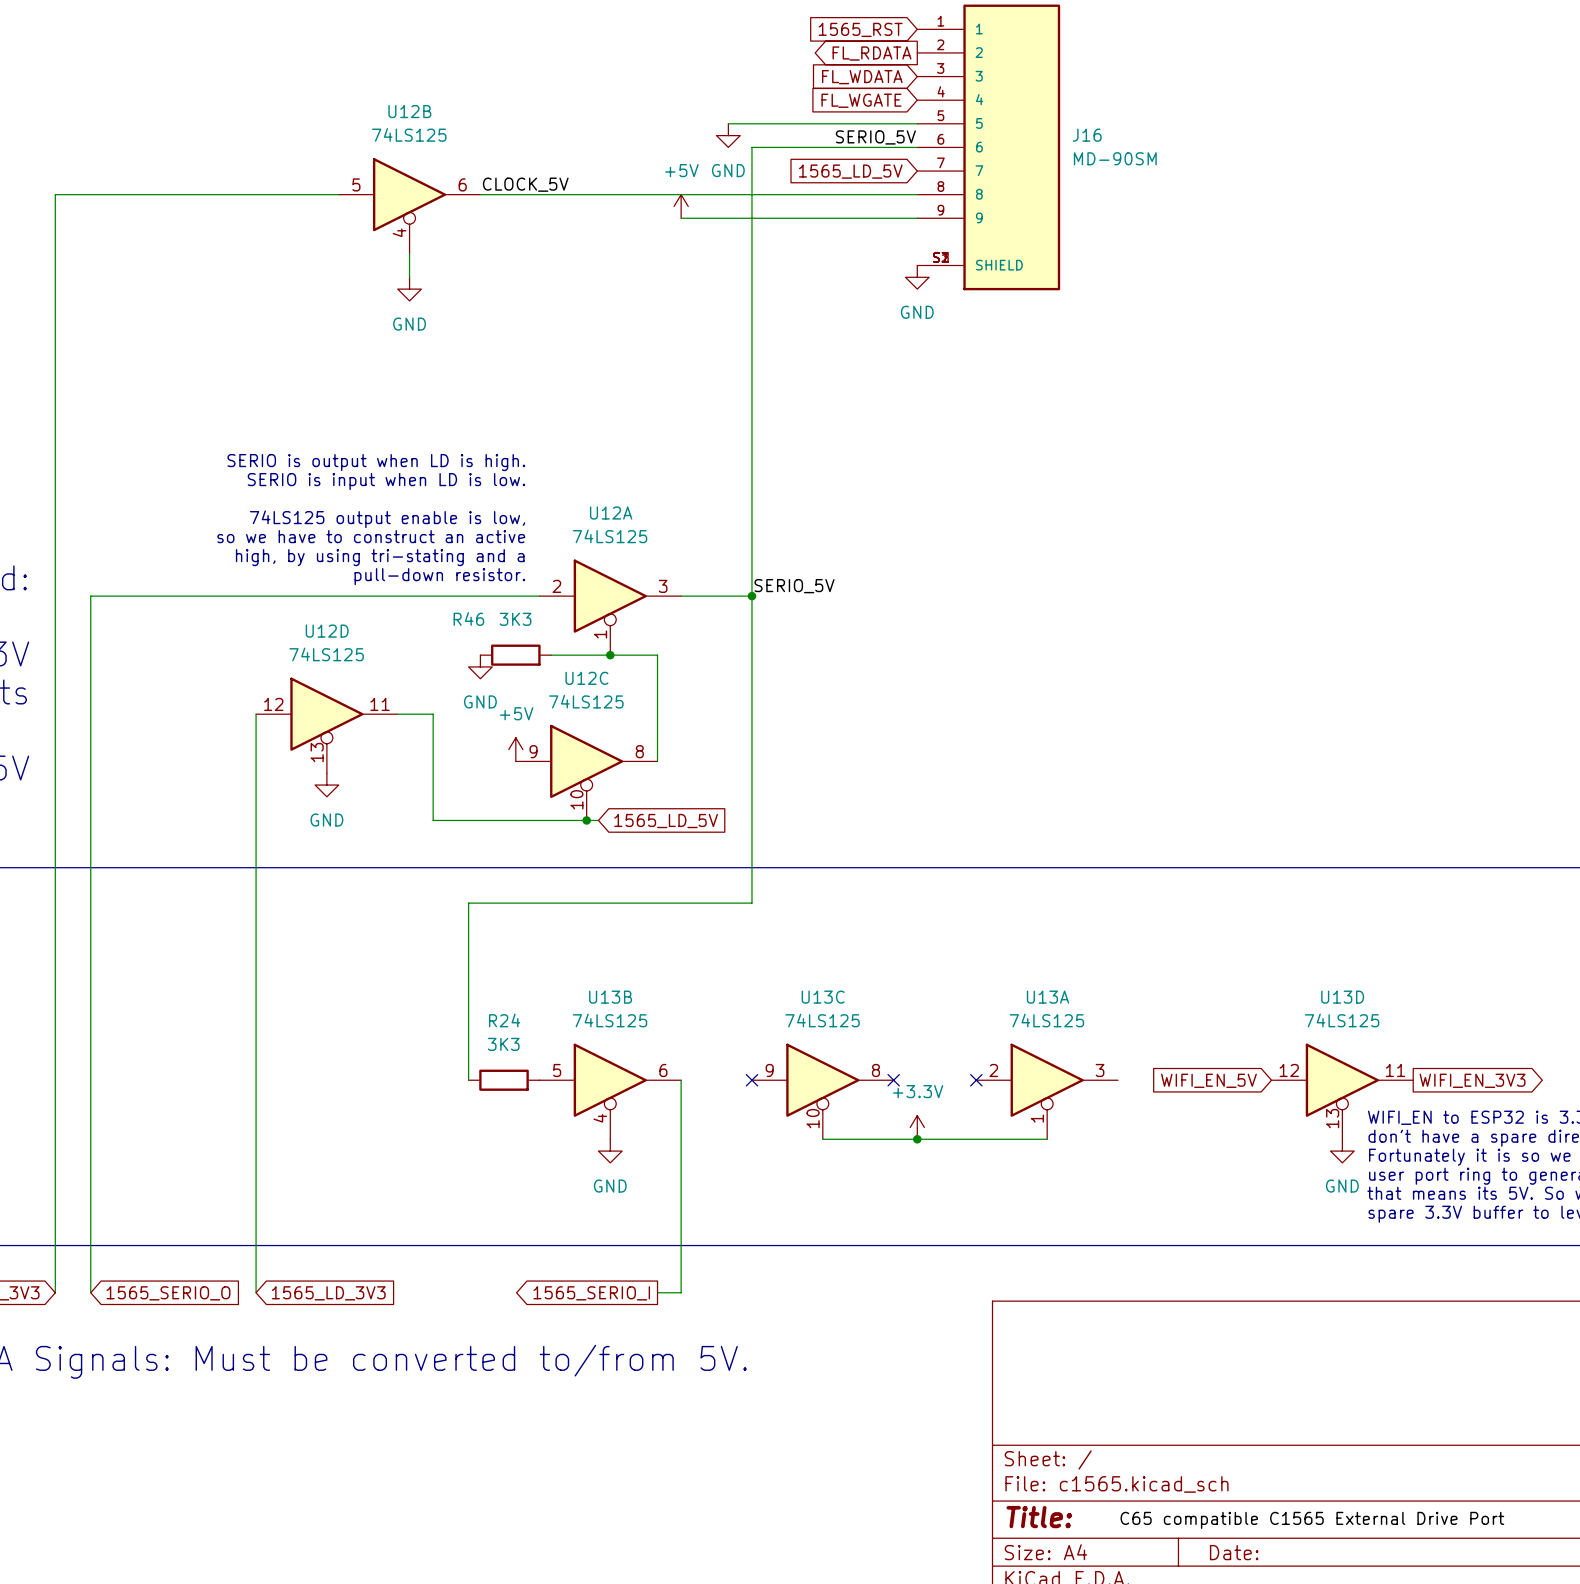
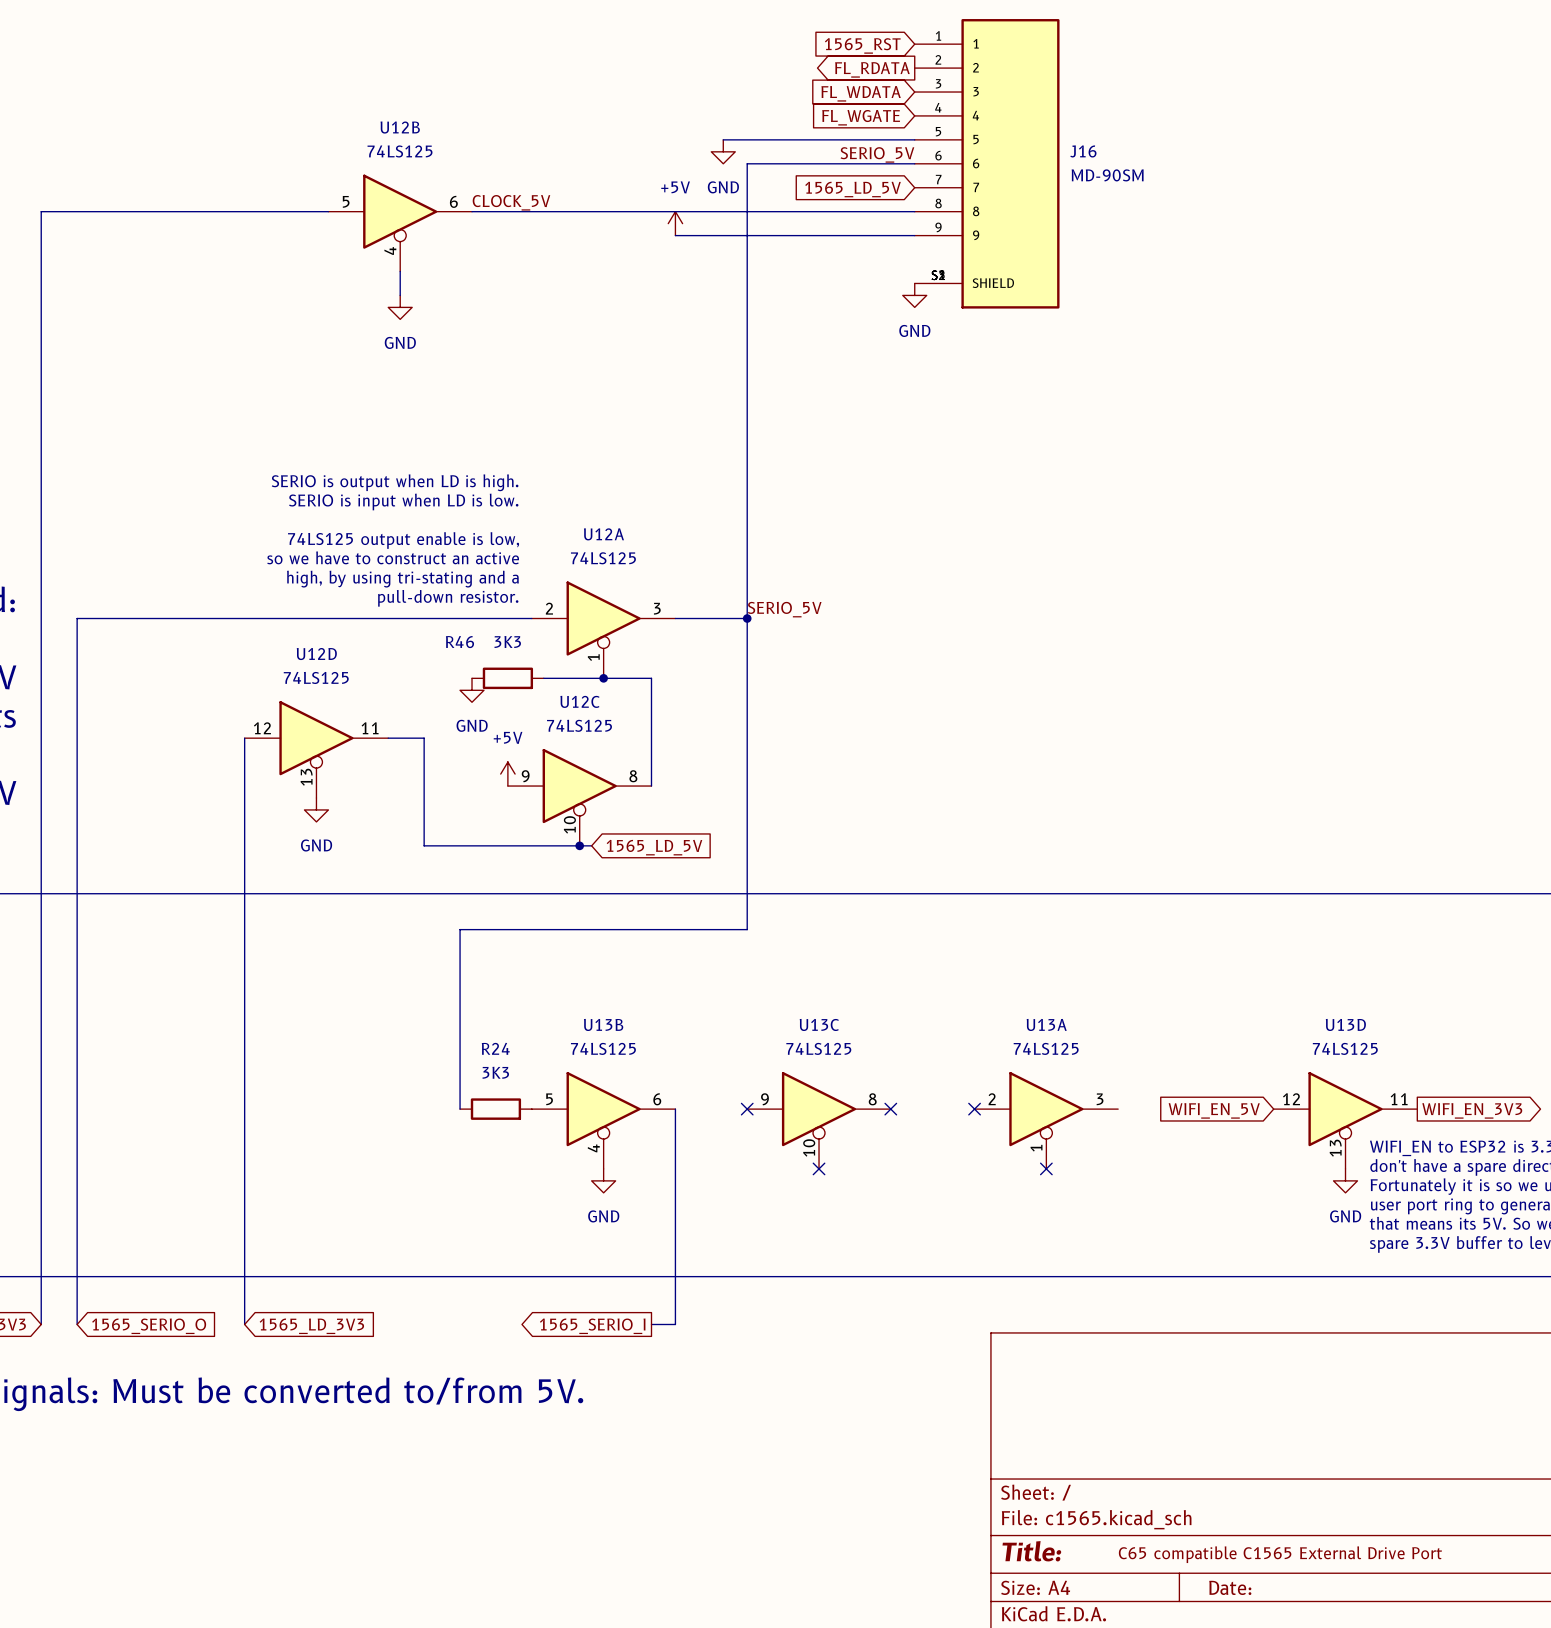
power symbol: +3.3V (917, 1127) -> none
wire: (822, 1139) (1047, 1139) -> none
no-connect mark: none -> (819, 1168)
junction: (917, 1139) -> none
no-connect mark: none -> (1046, 1168)

